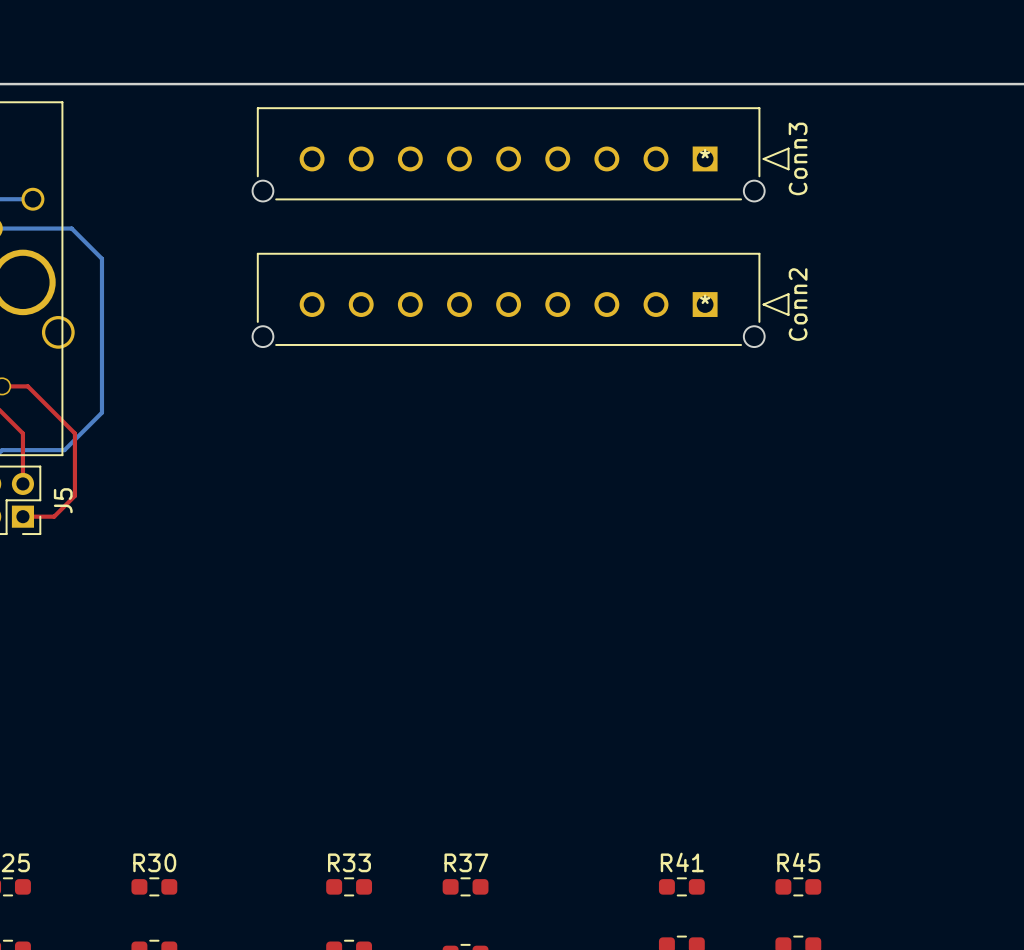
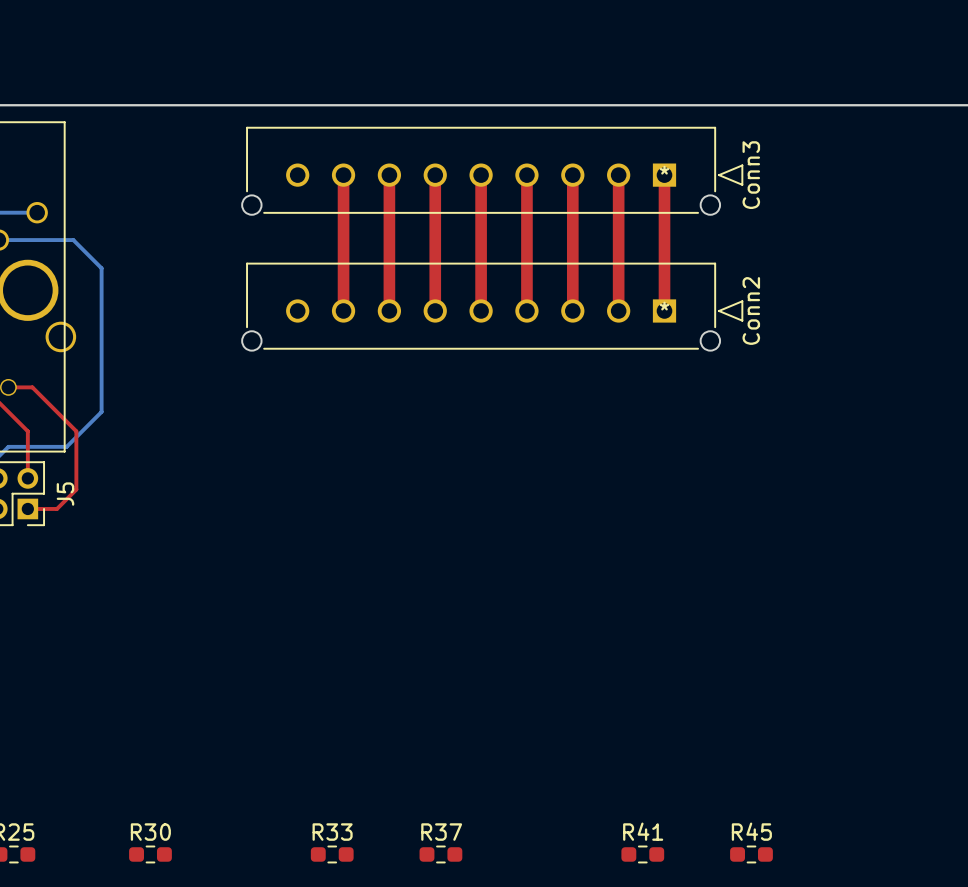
top track: none -> (343, 175) (343, 310)
top track: none -> (389, 175) (389, 310)
top track: none -> (435, 175) (435, 310)
top track: none -> (481, 175) (481, 310)
top track: none -> (526, 175) (526, 310)
top track: none -> (572, 175) (572, 310)
top track: none -> (618, 175) (618, 310)
top track: none -> (664, 175) (664, 310)

